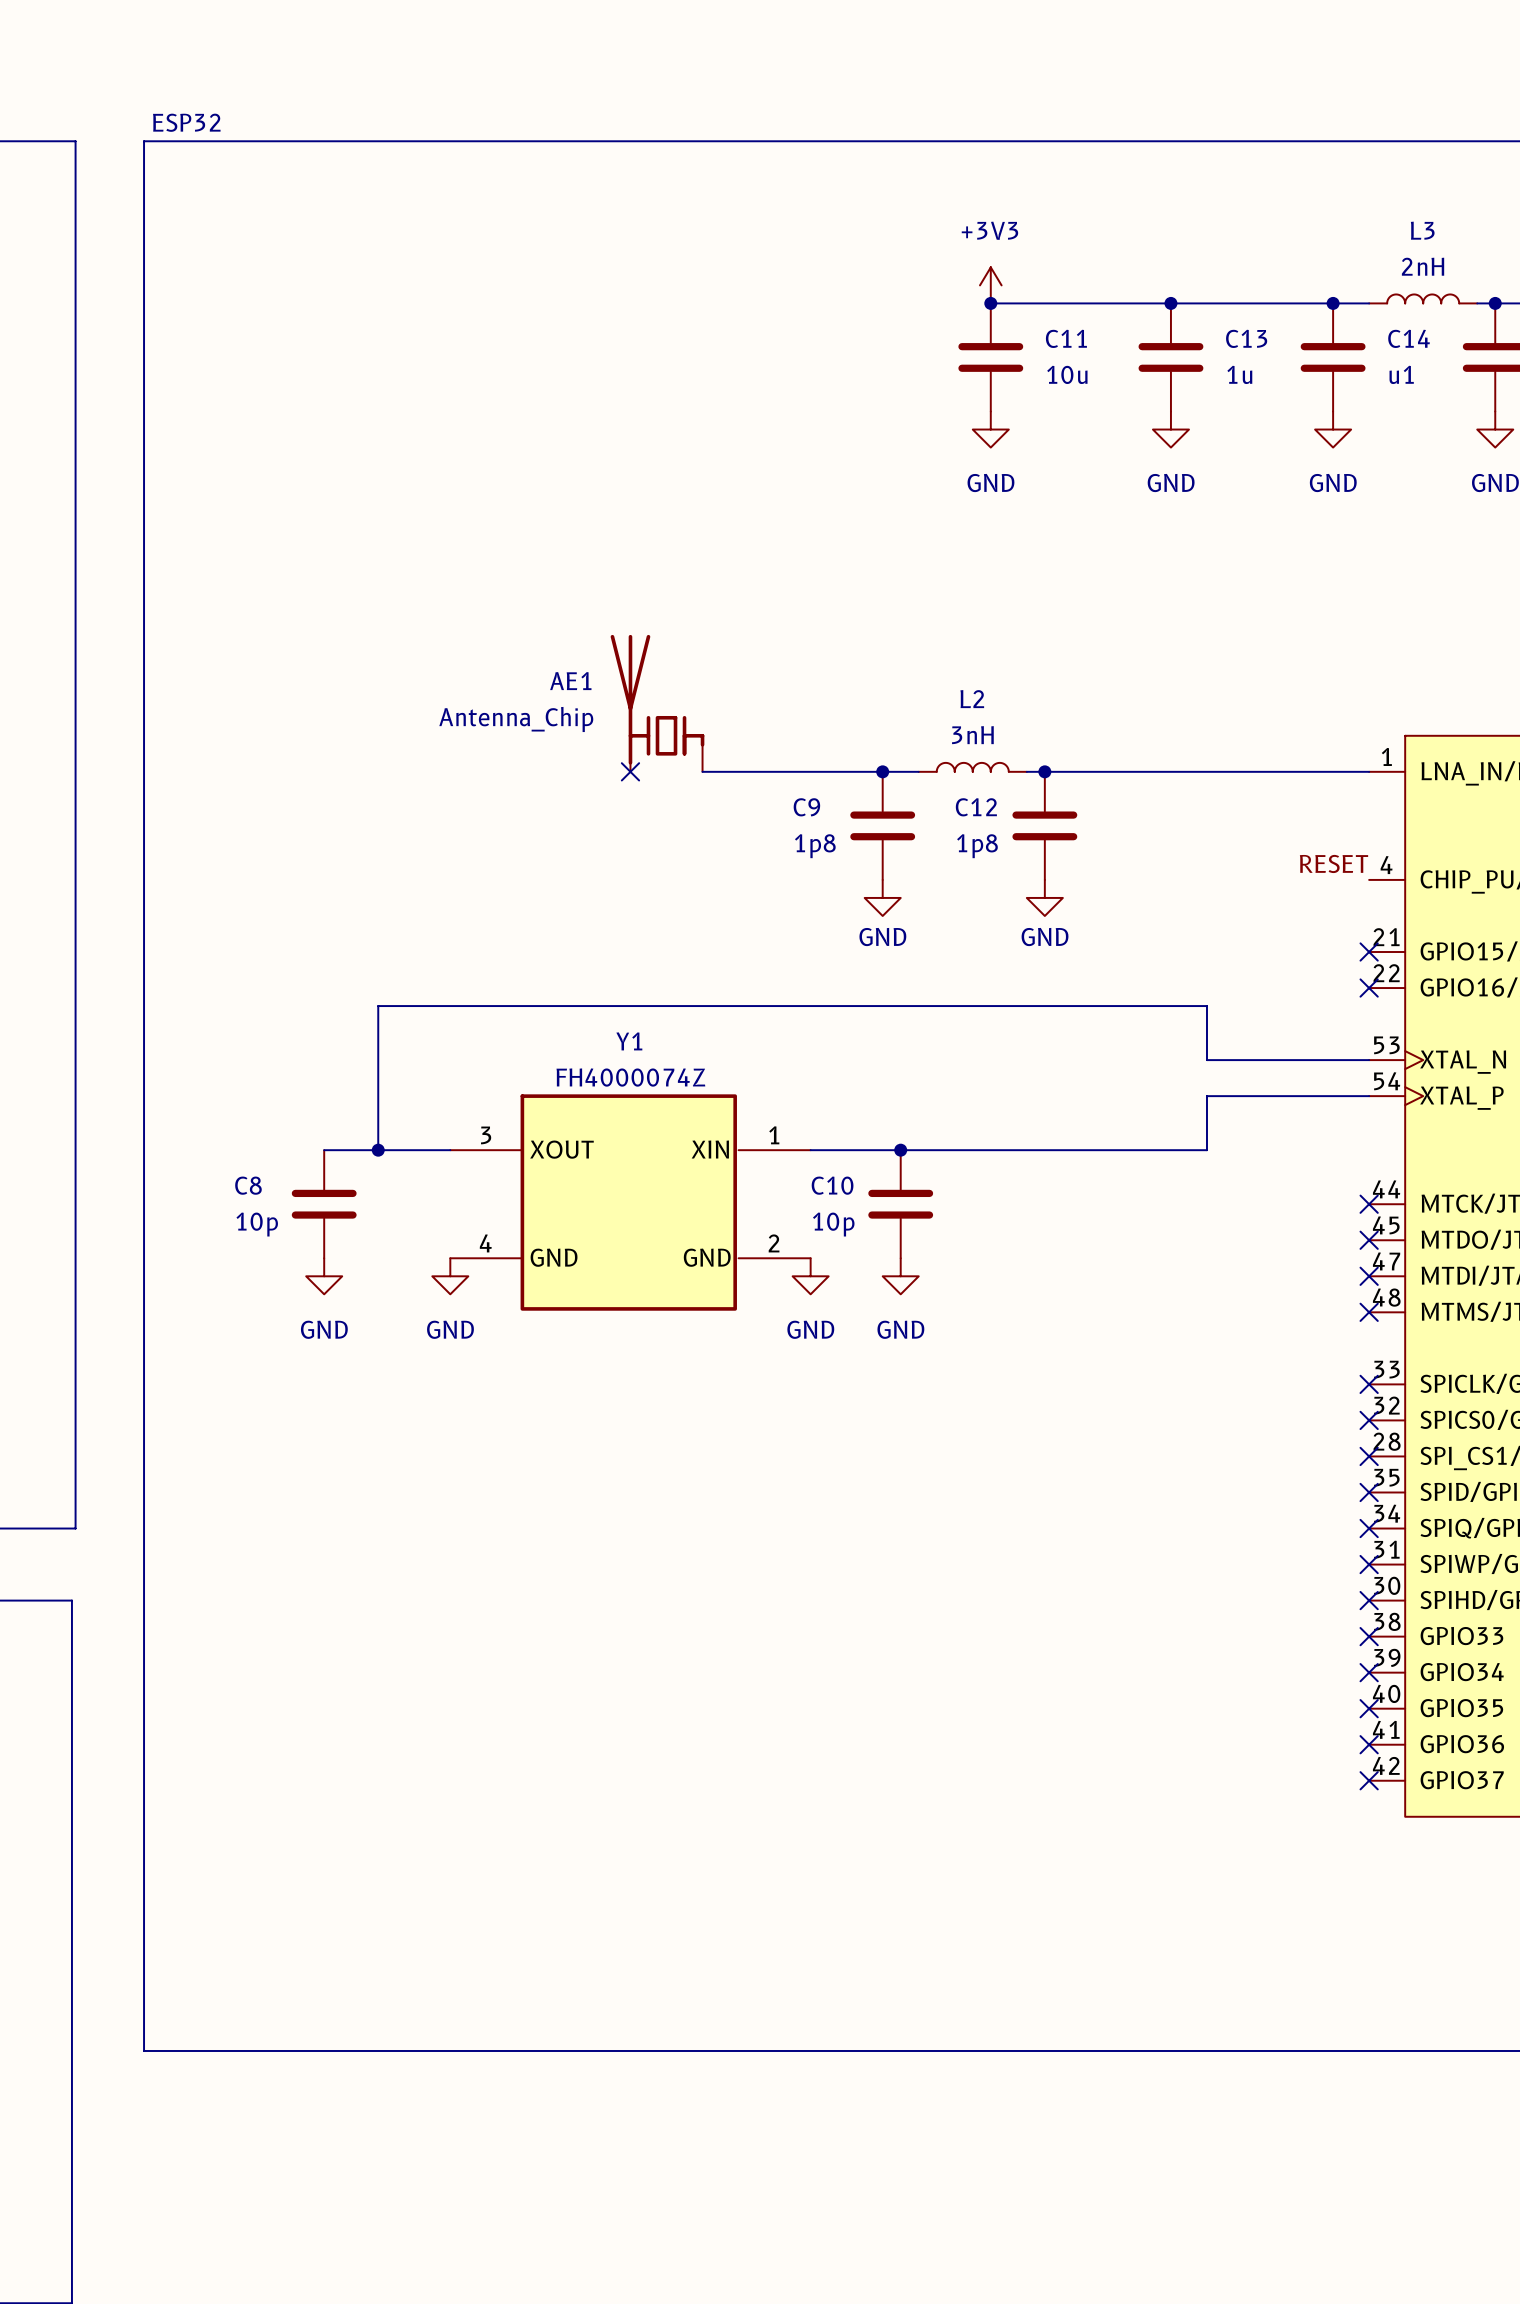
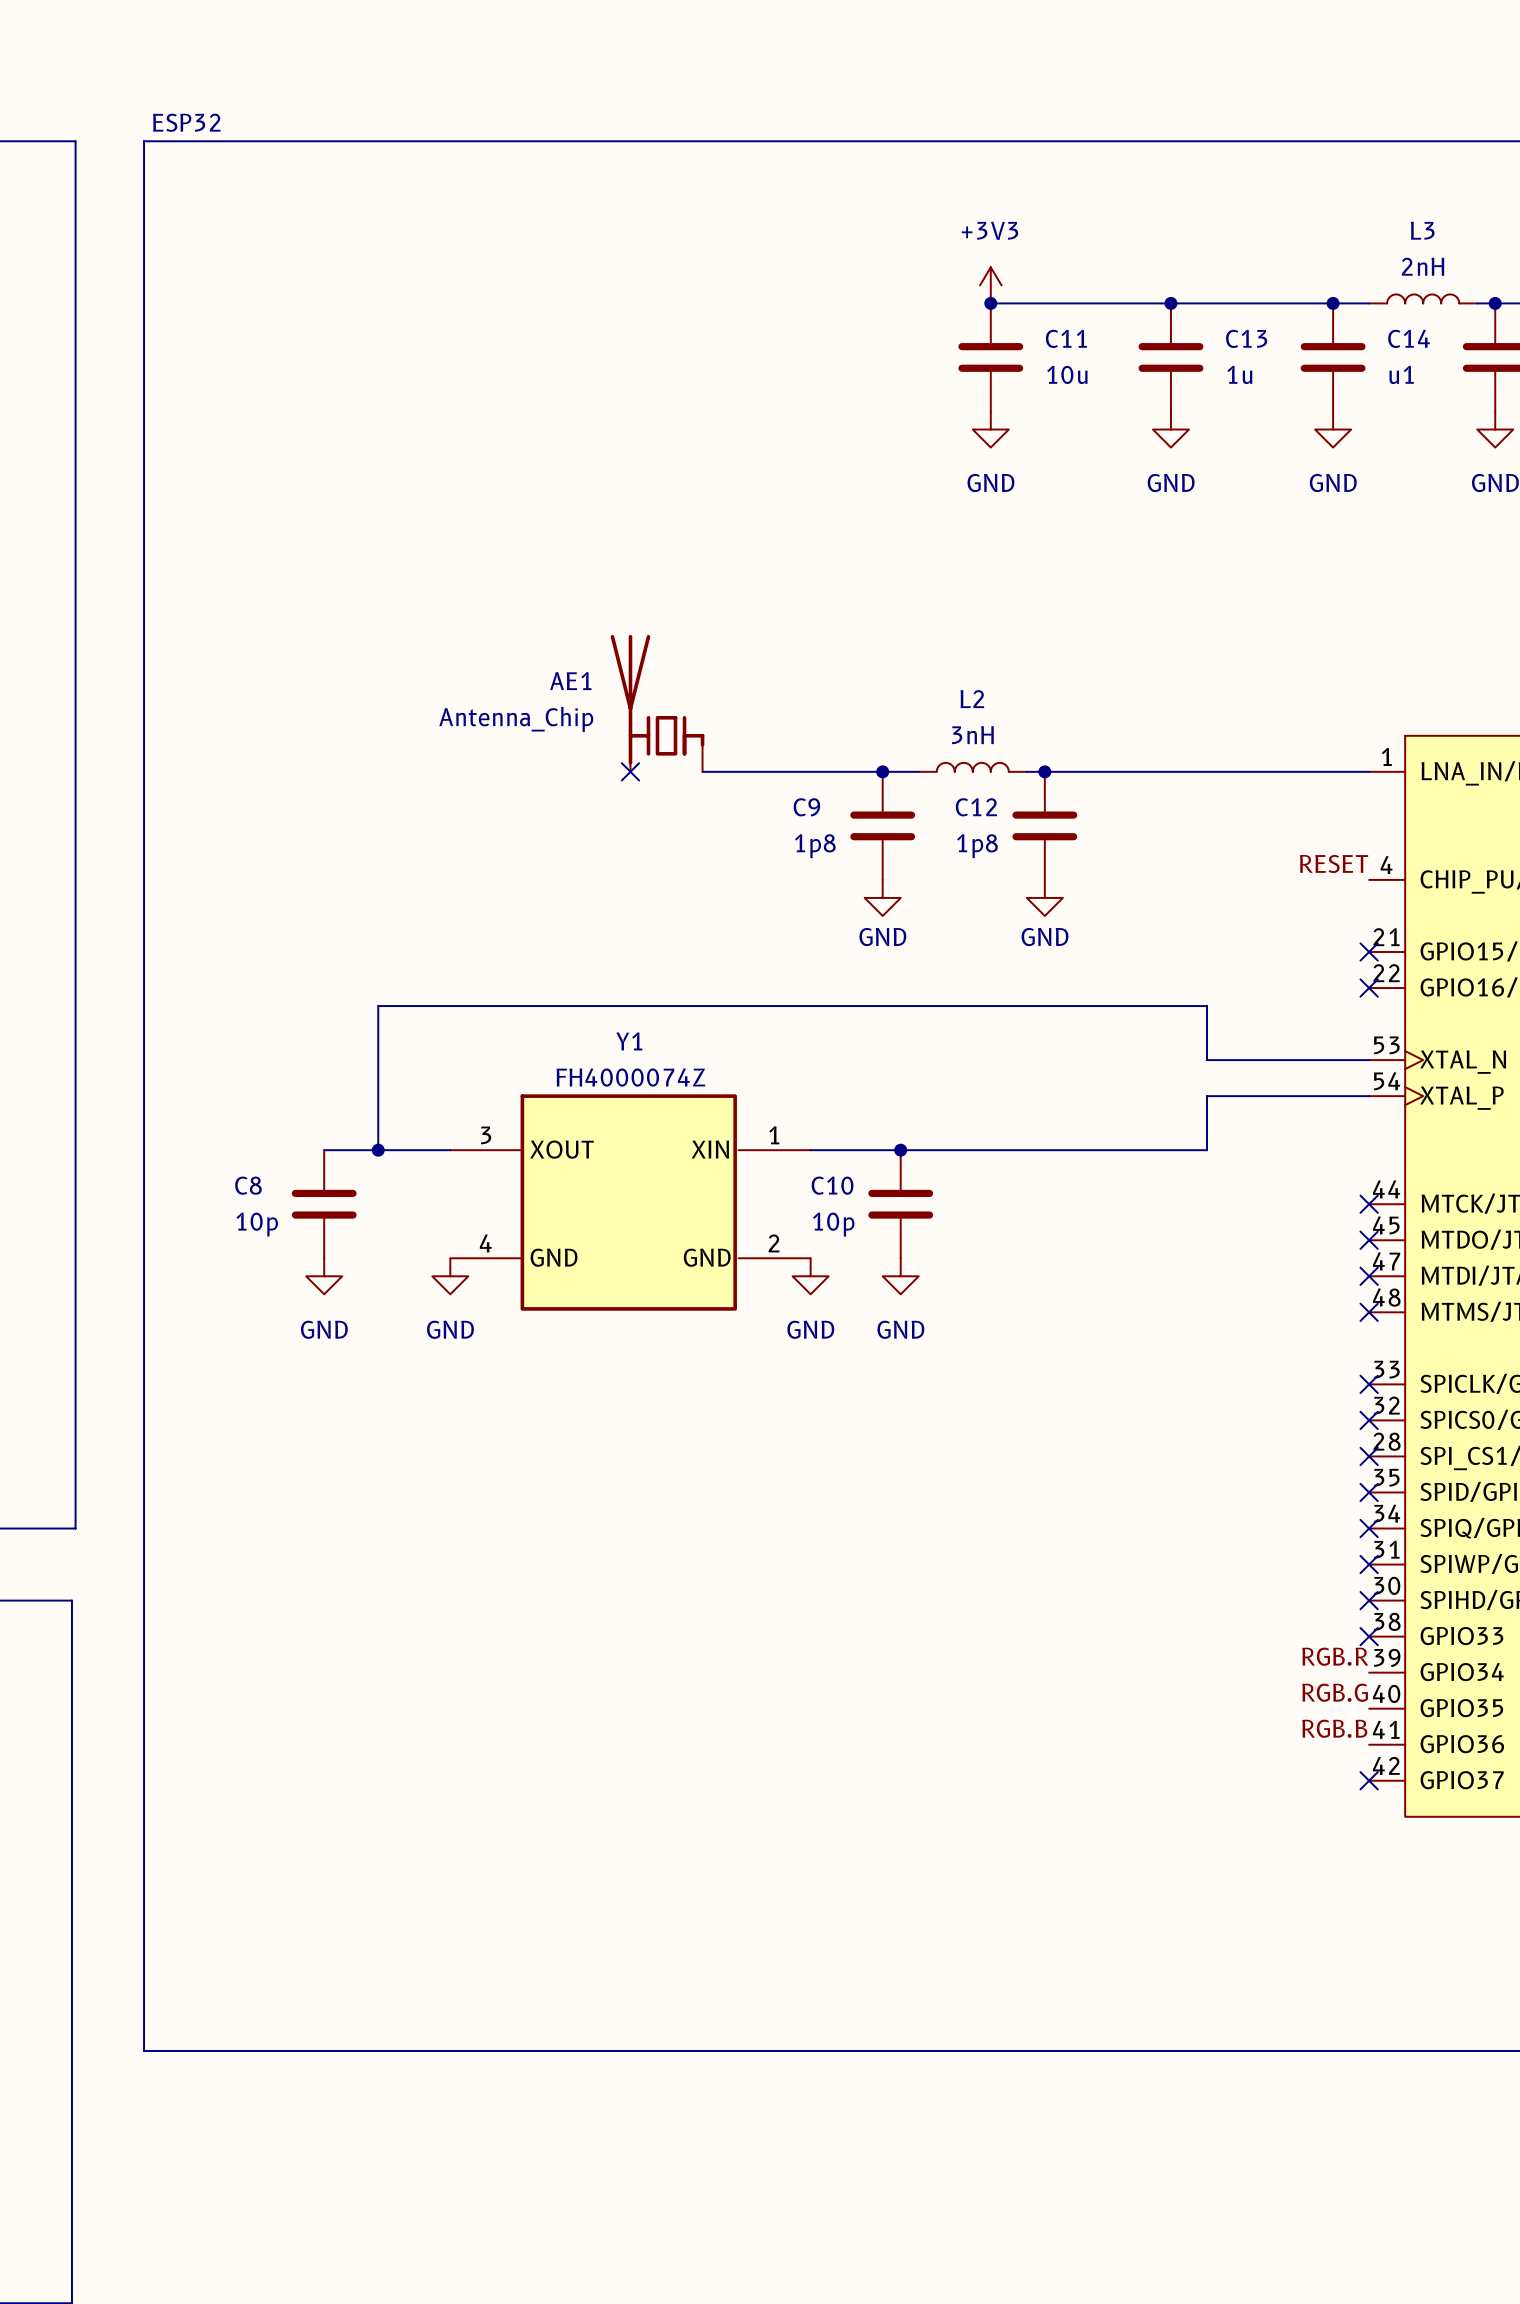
label: none -> RGB.R (1335, 1656)
no-connect mark: (1369, 1672) -> none
label: none -> RGB.G (1335, 1692)
no-connect mark: (1369, 1708) -> none
label: none -> RGB.B (1334, 1728)
no-connect mark: (1369, 1744) -> none

